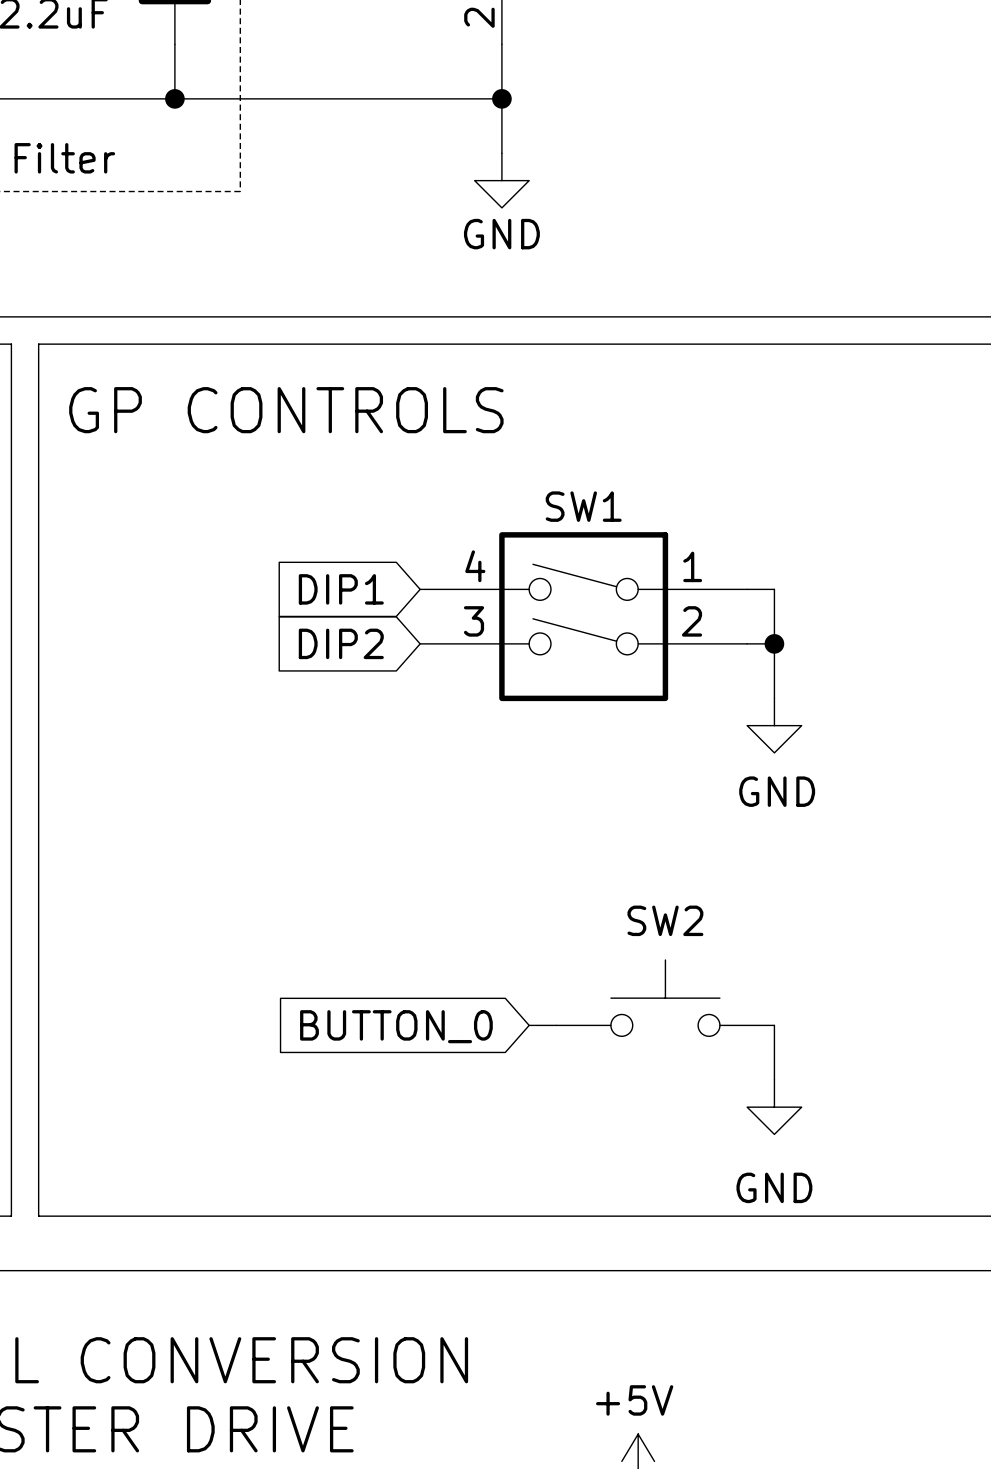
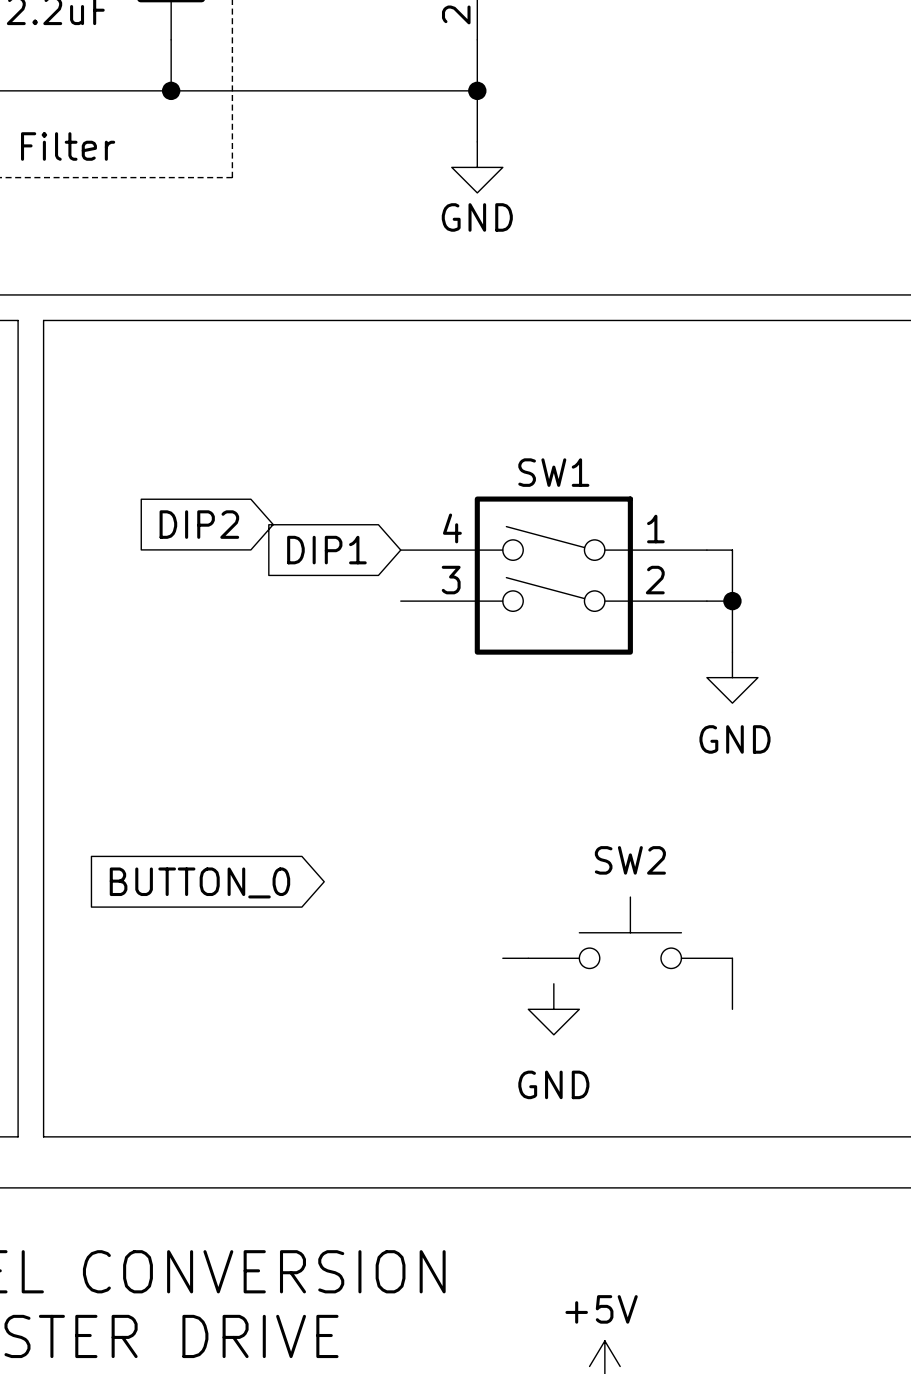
text: GP CONTROLS (286, 410) -> none
global label position: DIP2 (341, 643) -> DIP2 (199, 524)
global label position: BUTTON_0 (396, 1026) -> BUTTON_0 (199, 882)
power symbol position: GND (774, 1107) -> GND (553, 1009)

